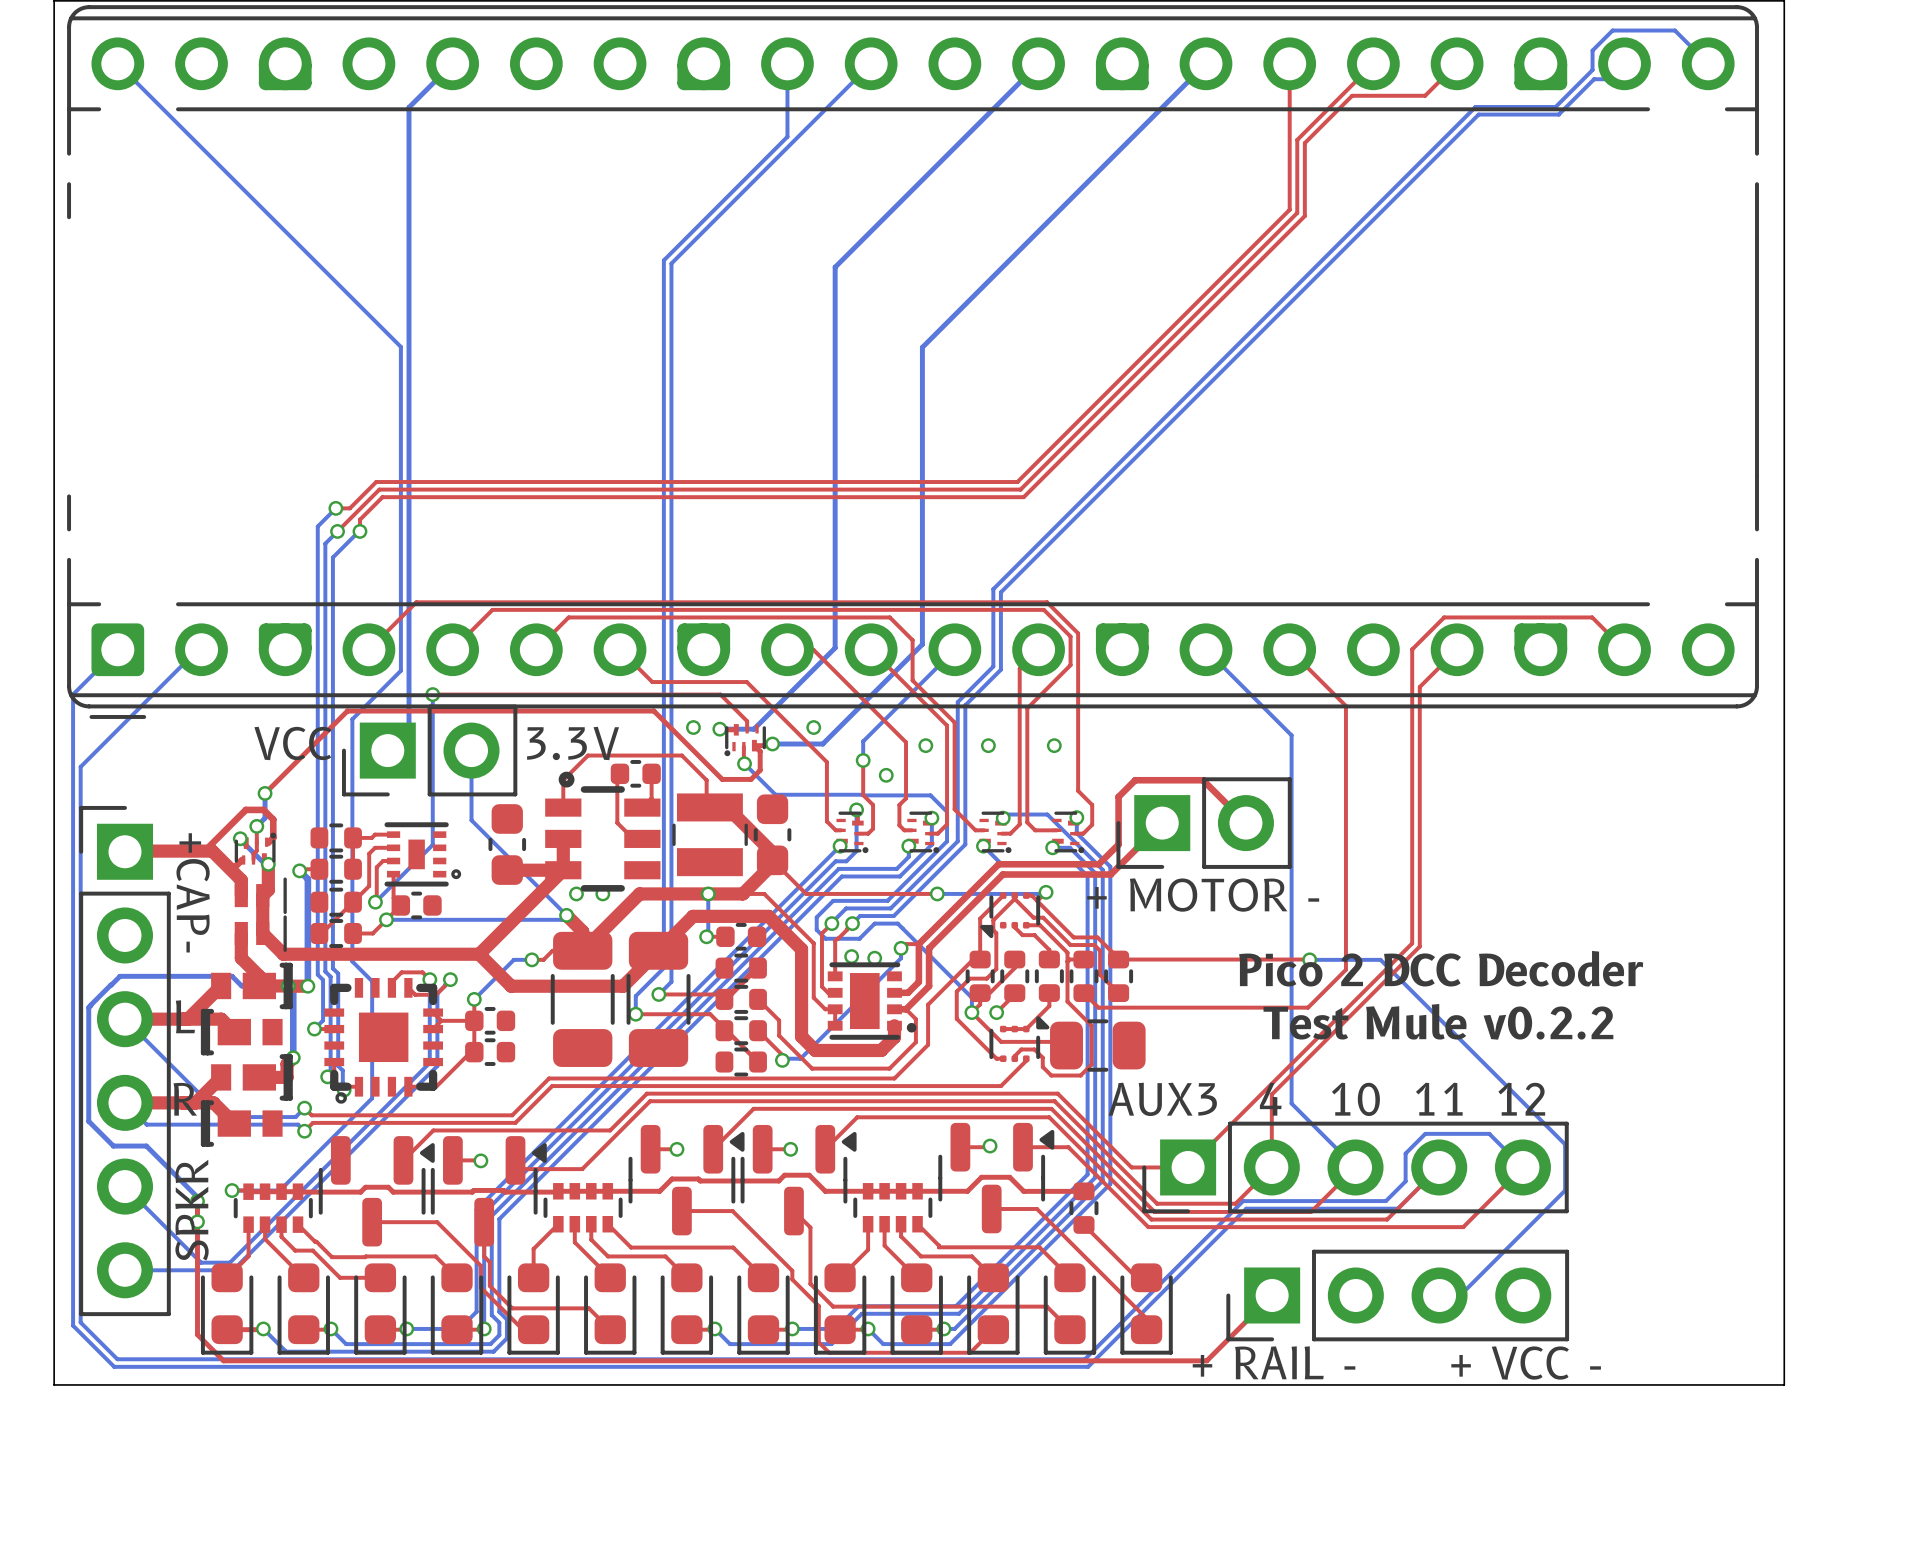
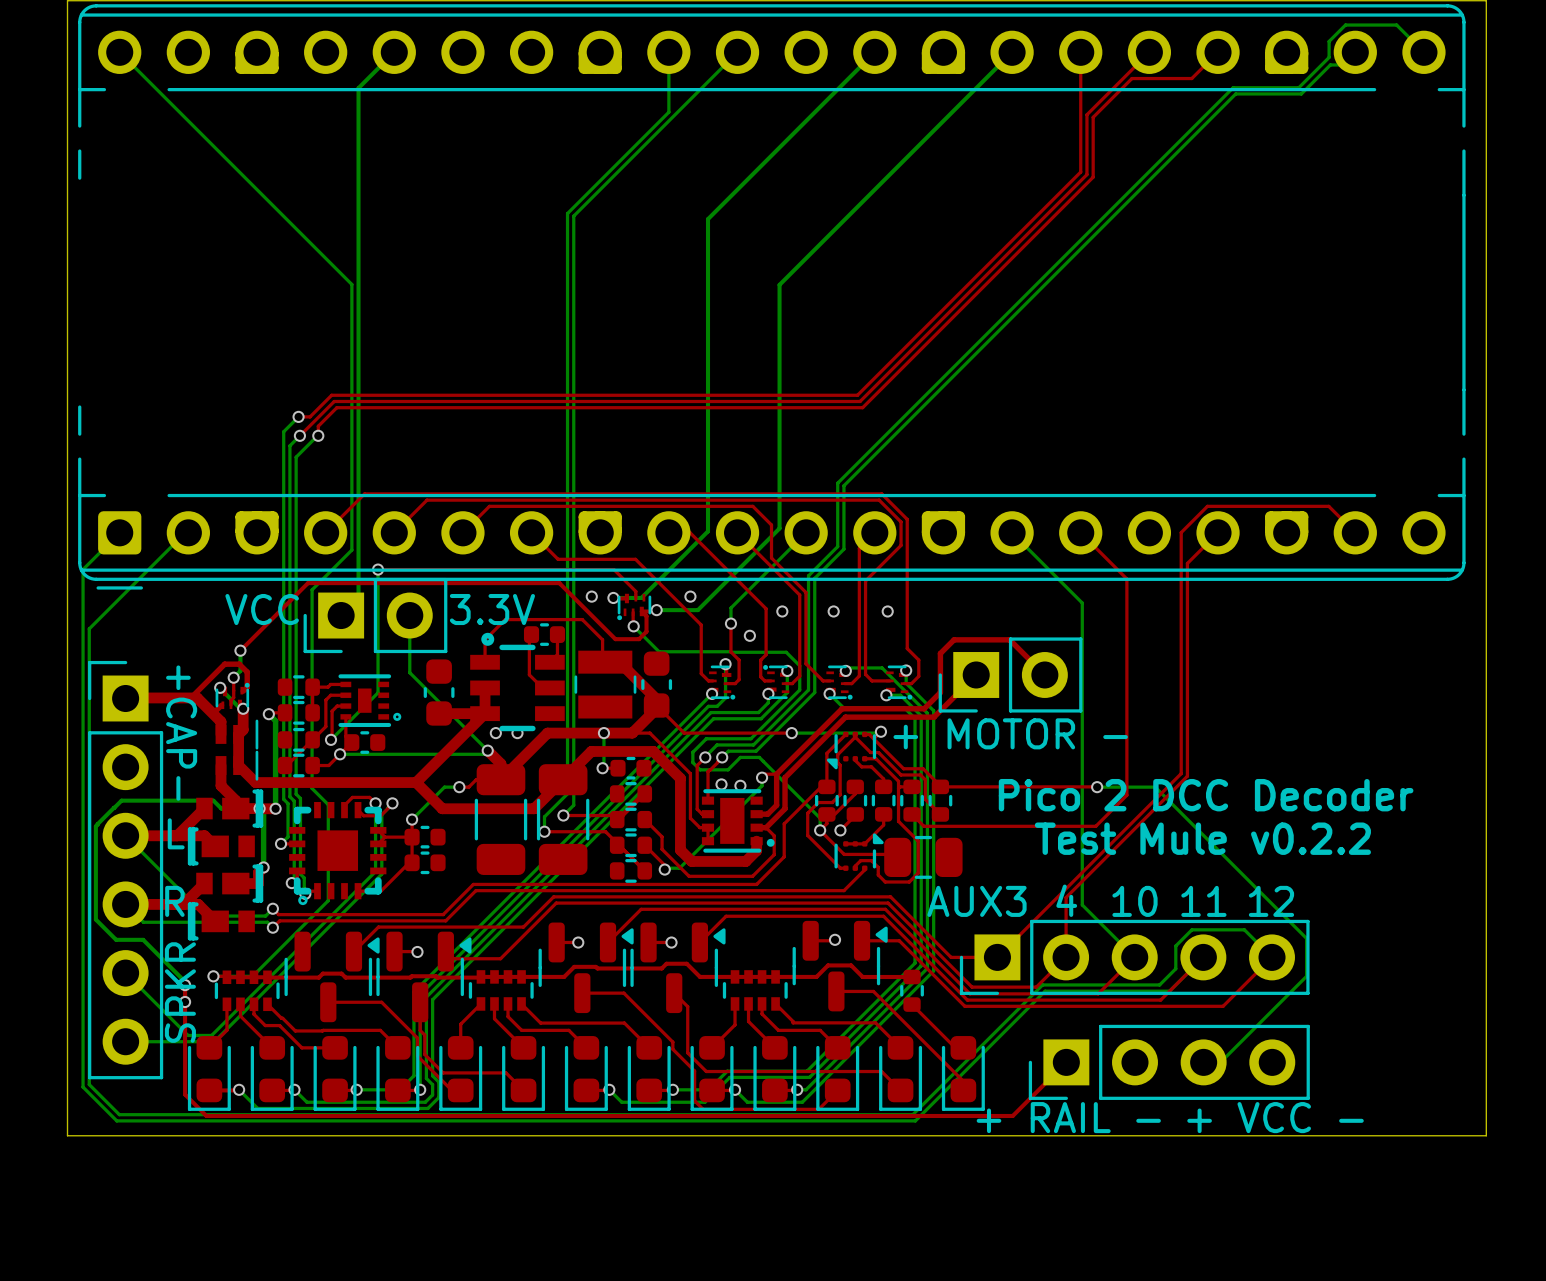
part rotation: 0° (923, 832) -> 180° (776, 682)

